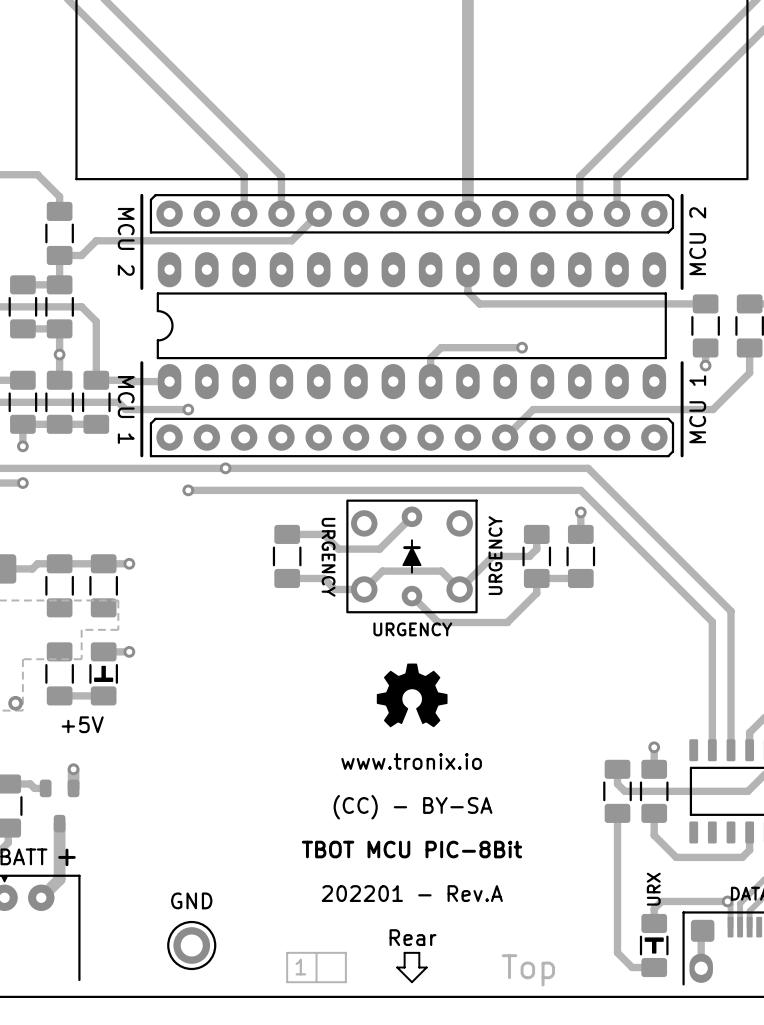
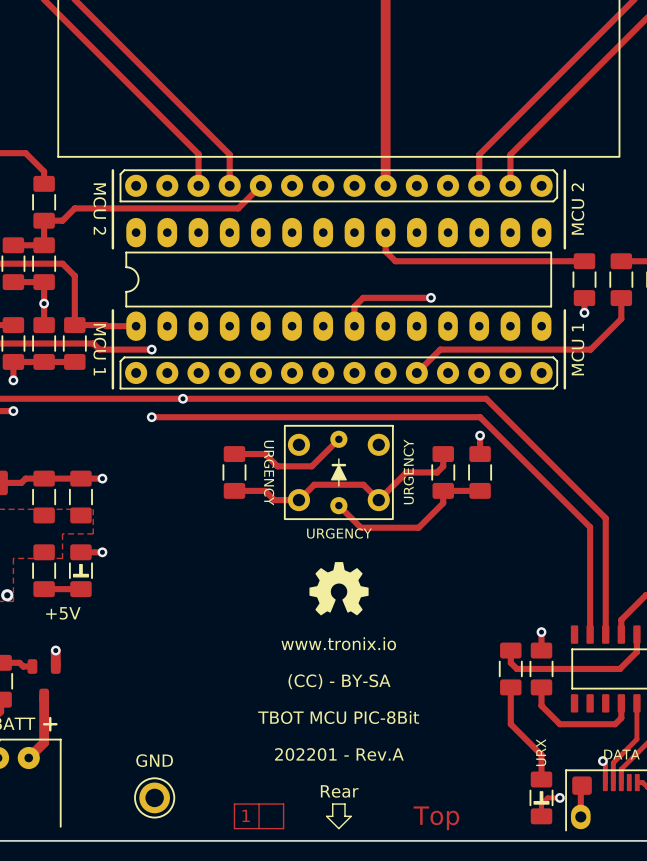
track: (617, 857) (617, 952) (632, 967) (654, 967) -> (510, 724) (541, 754) (541, 767)
track: (727, 901) (661, 901) (654, 908) -> none
part rotation: 0° (654, 945) -> 180° (541, 797)
track: none -> (559, 797) (547, 797) (541, 804) (541, 816)
via: none -> (559, 797)

